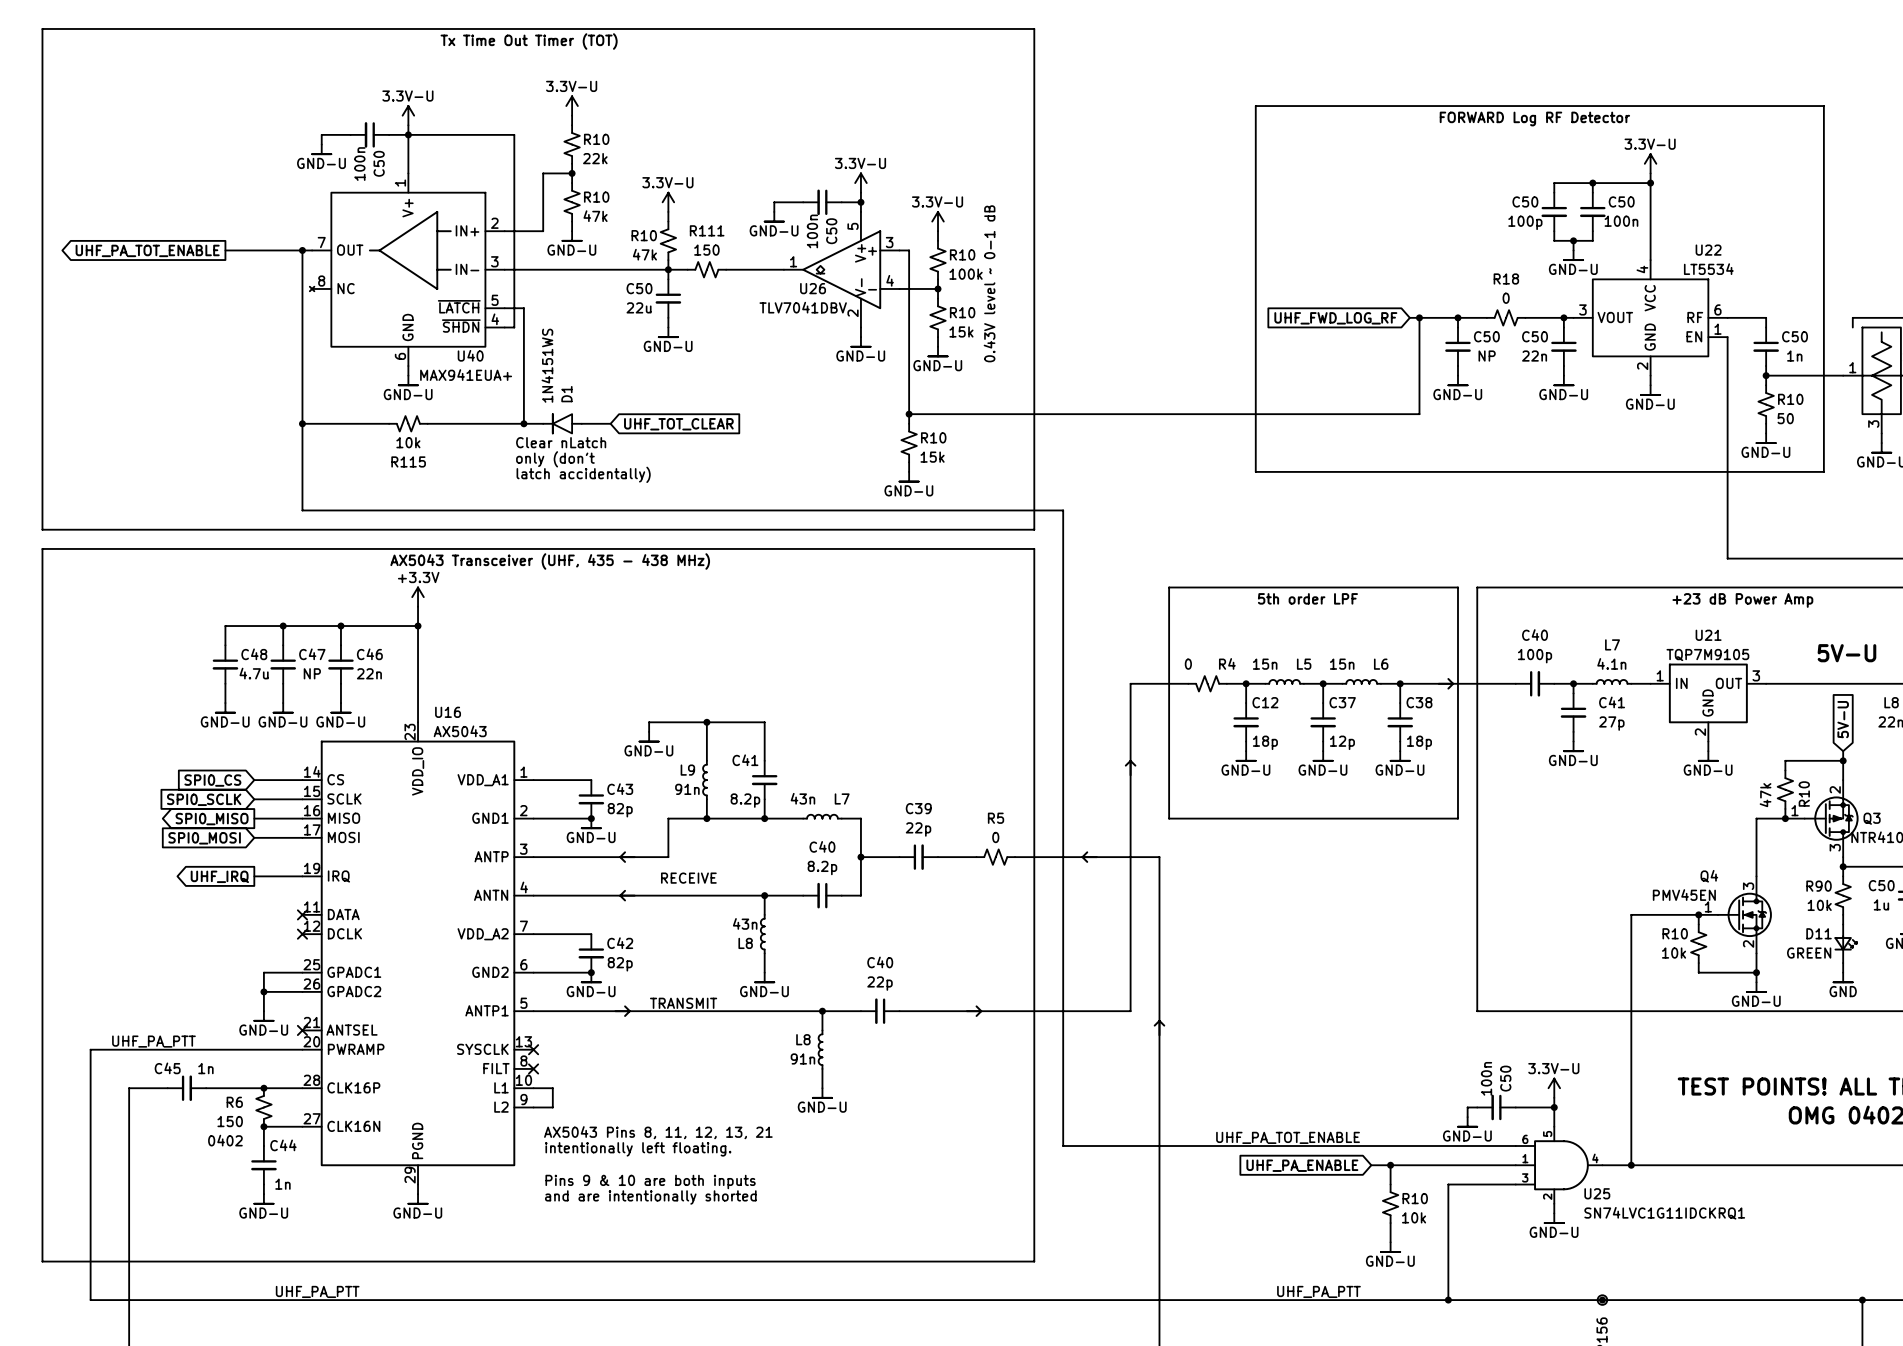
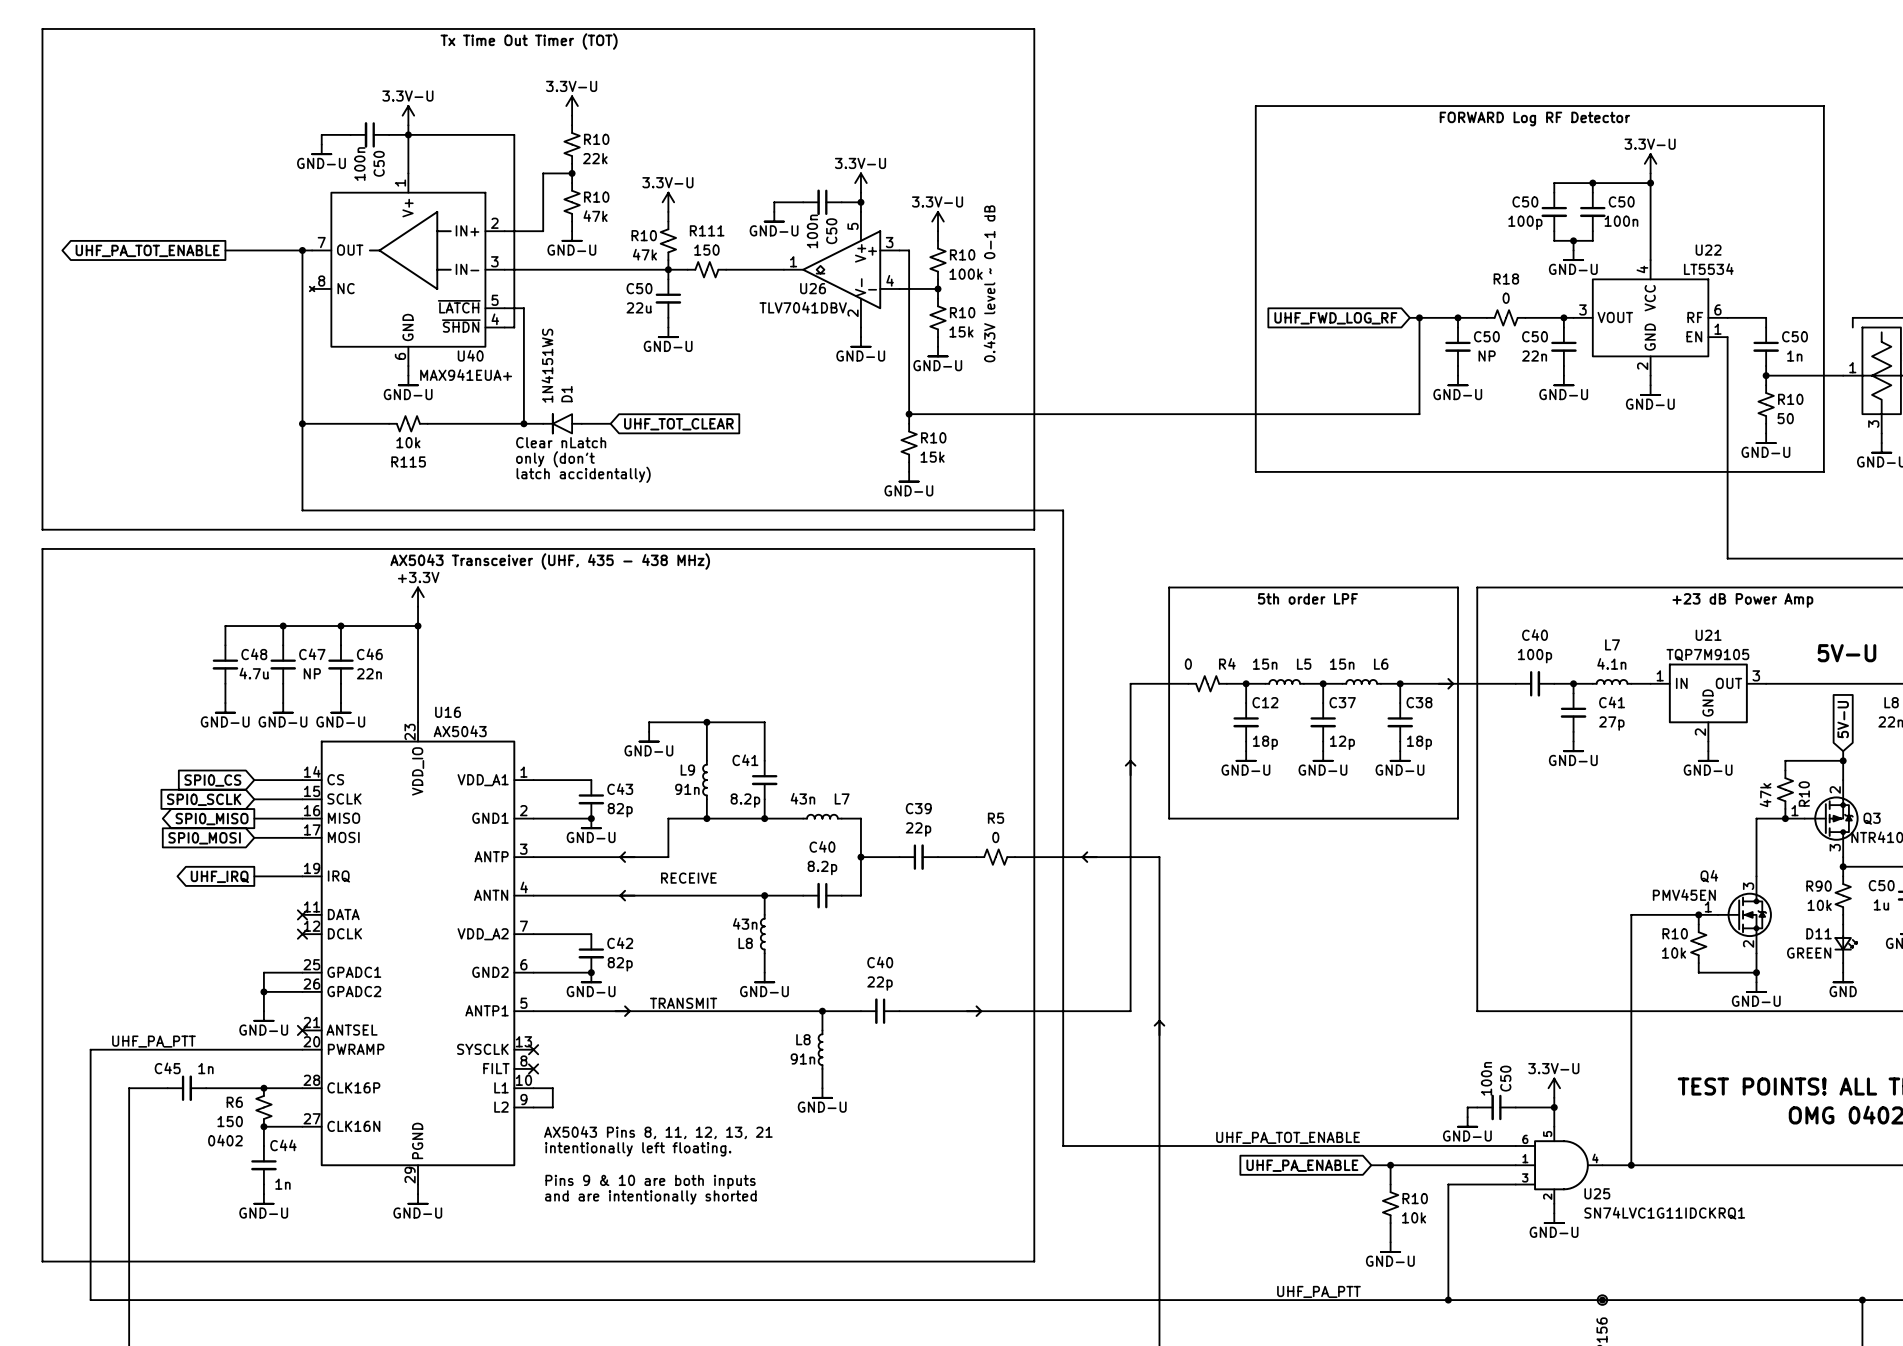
label: UHF_PA_PTT (317, 1291) -> none

